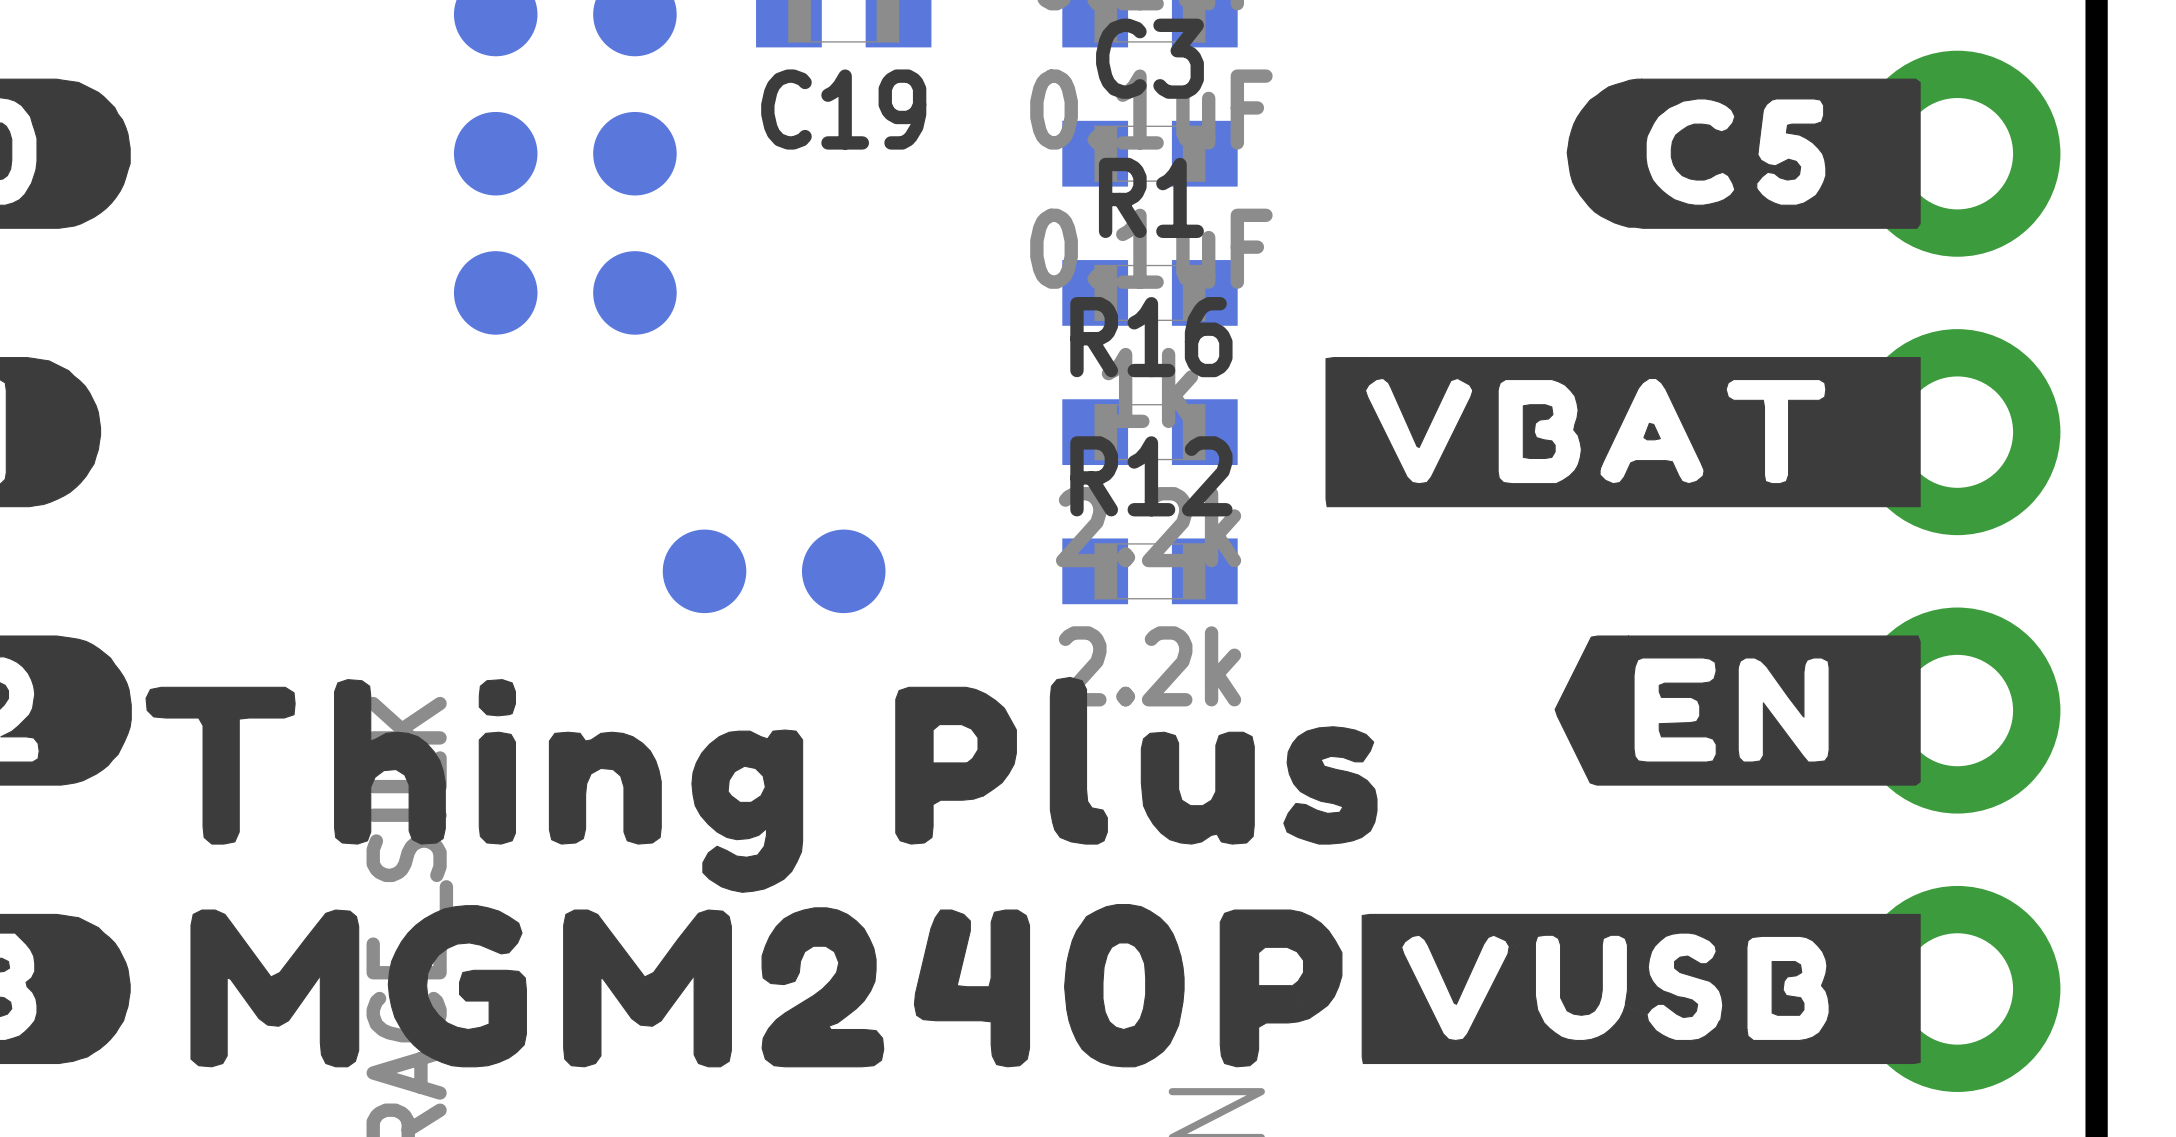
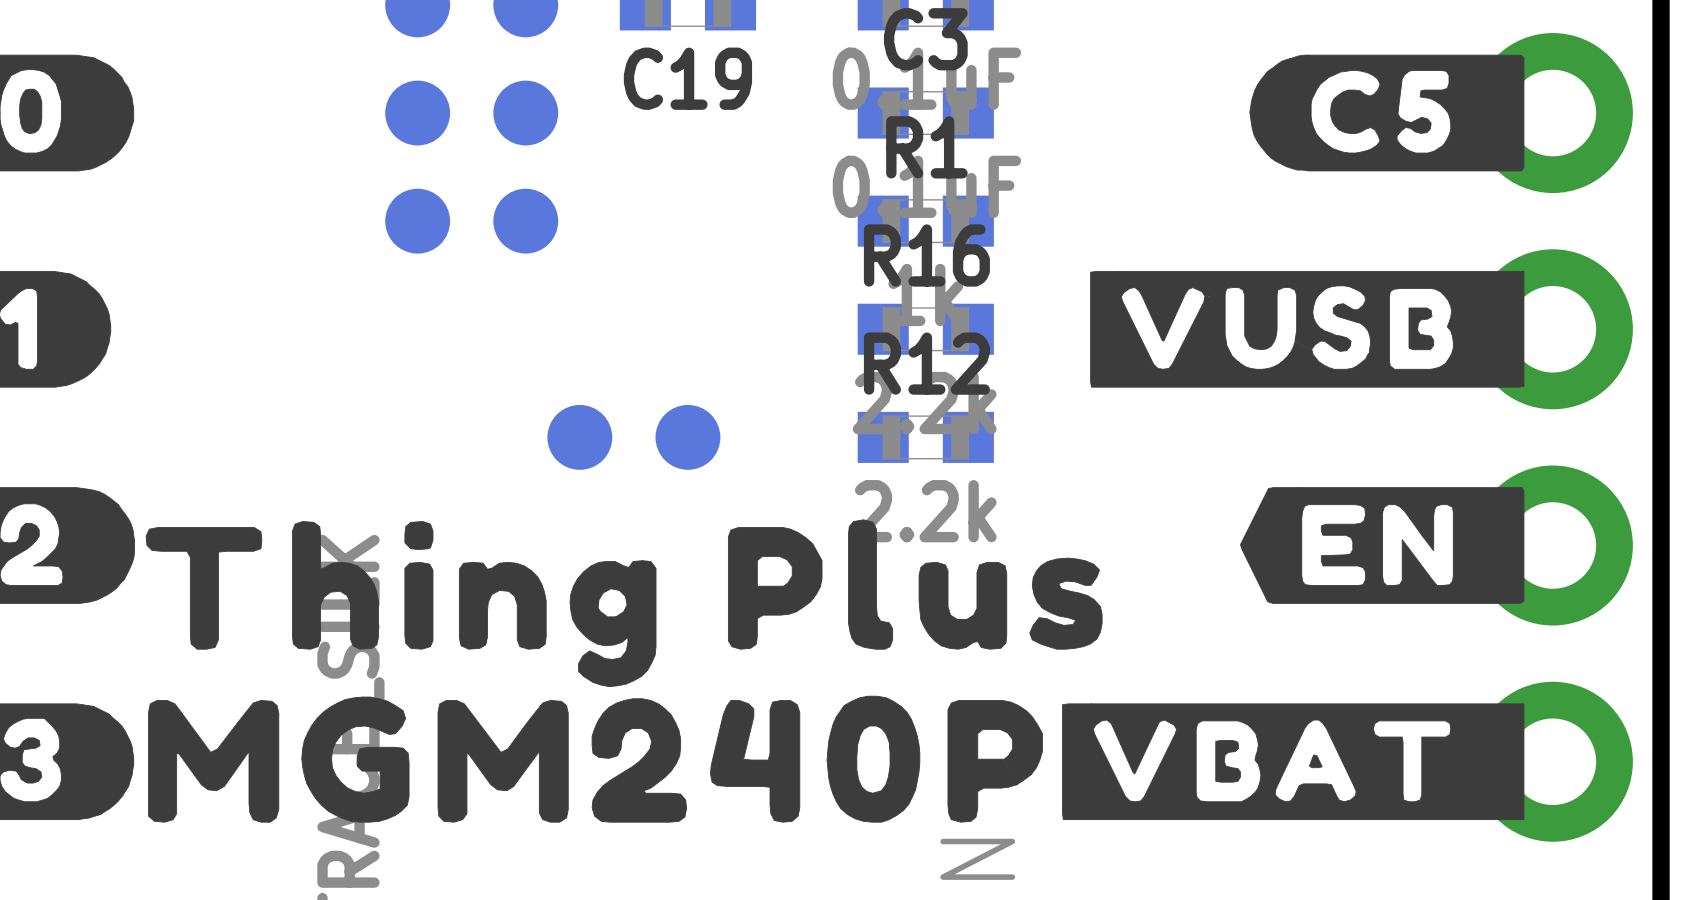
drawing position: (1623, 432) -> (1293, 761)
drawing position: (766, 985) -> (595, 759)
drawing position: (1641, 988) -> (1307, 329)

